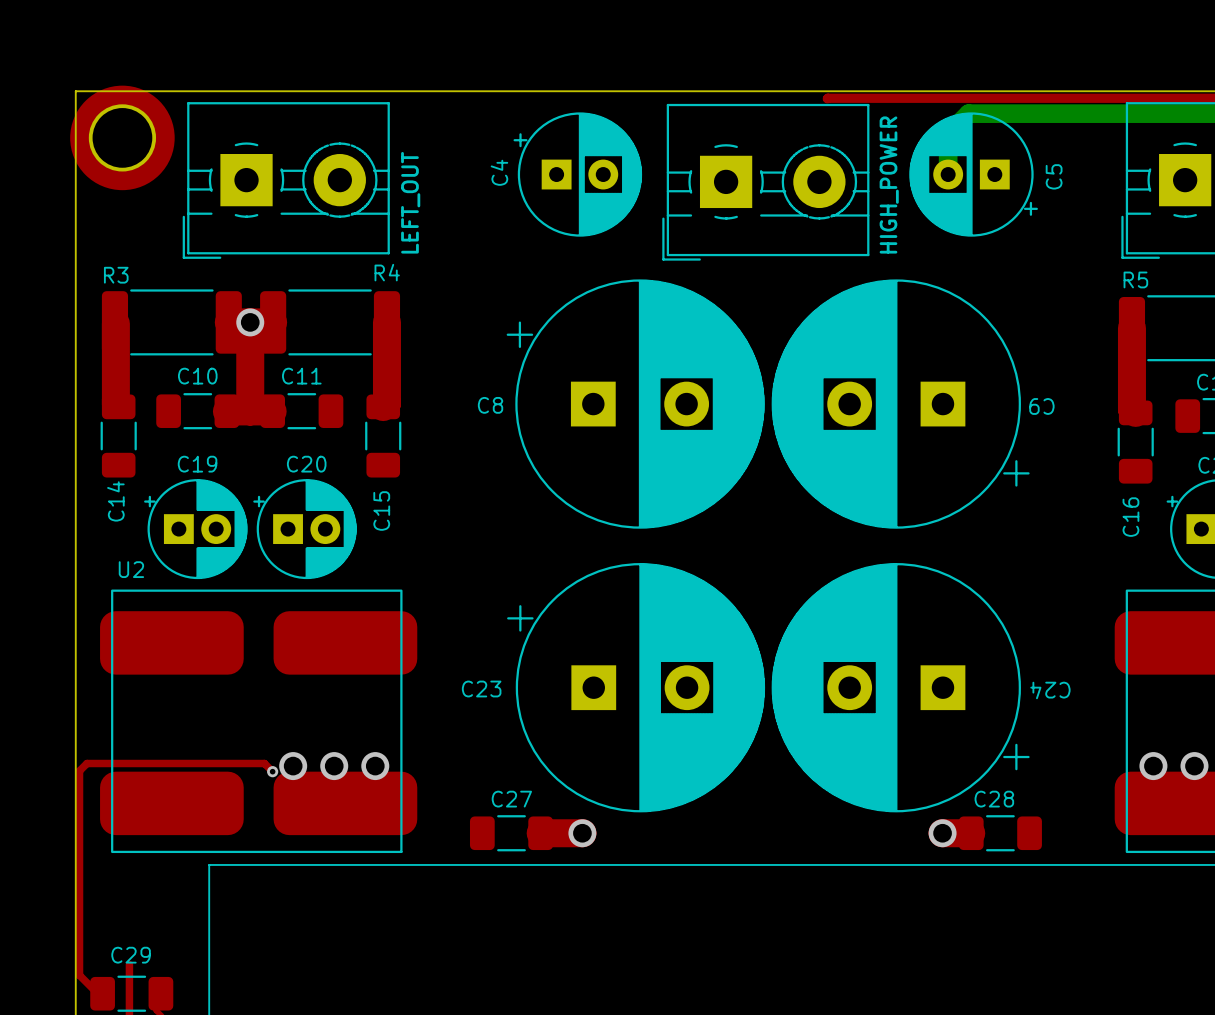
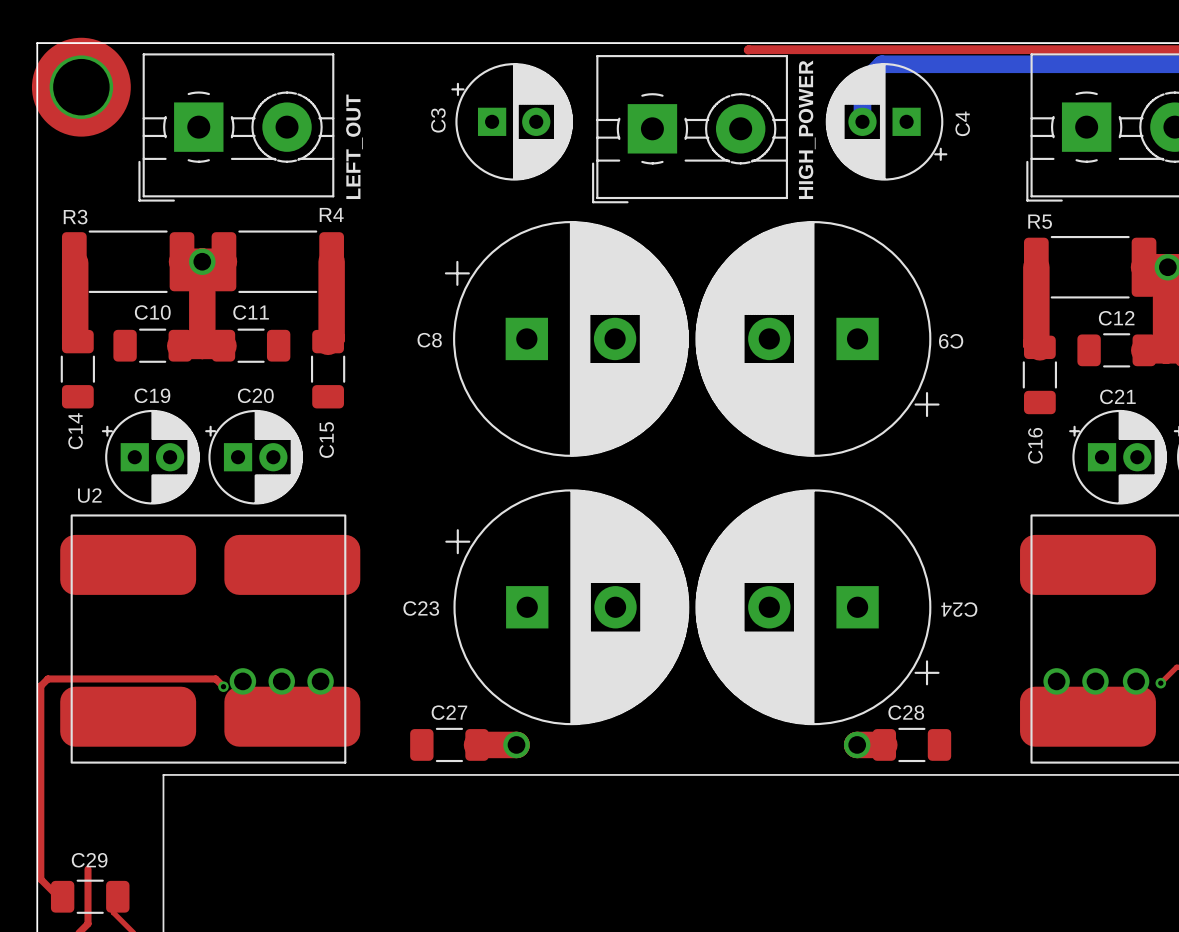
C4 name: C4 (499, 172) -> C3 (438, 120)
C5 name: C5 (1054, 176) -> C4 (962, 123)

